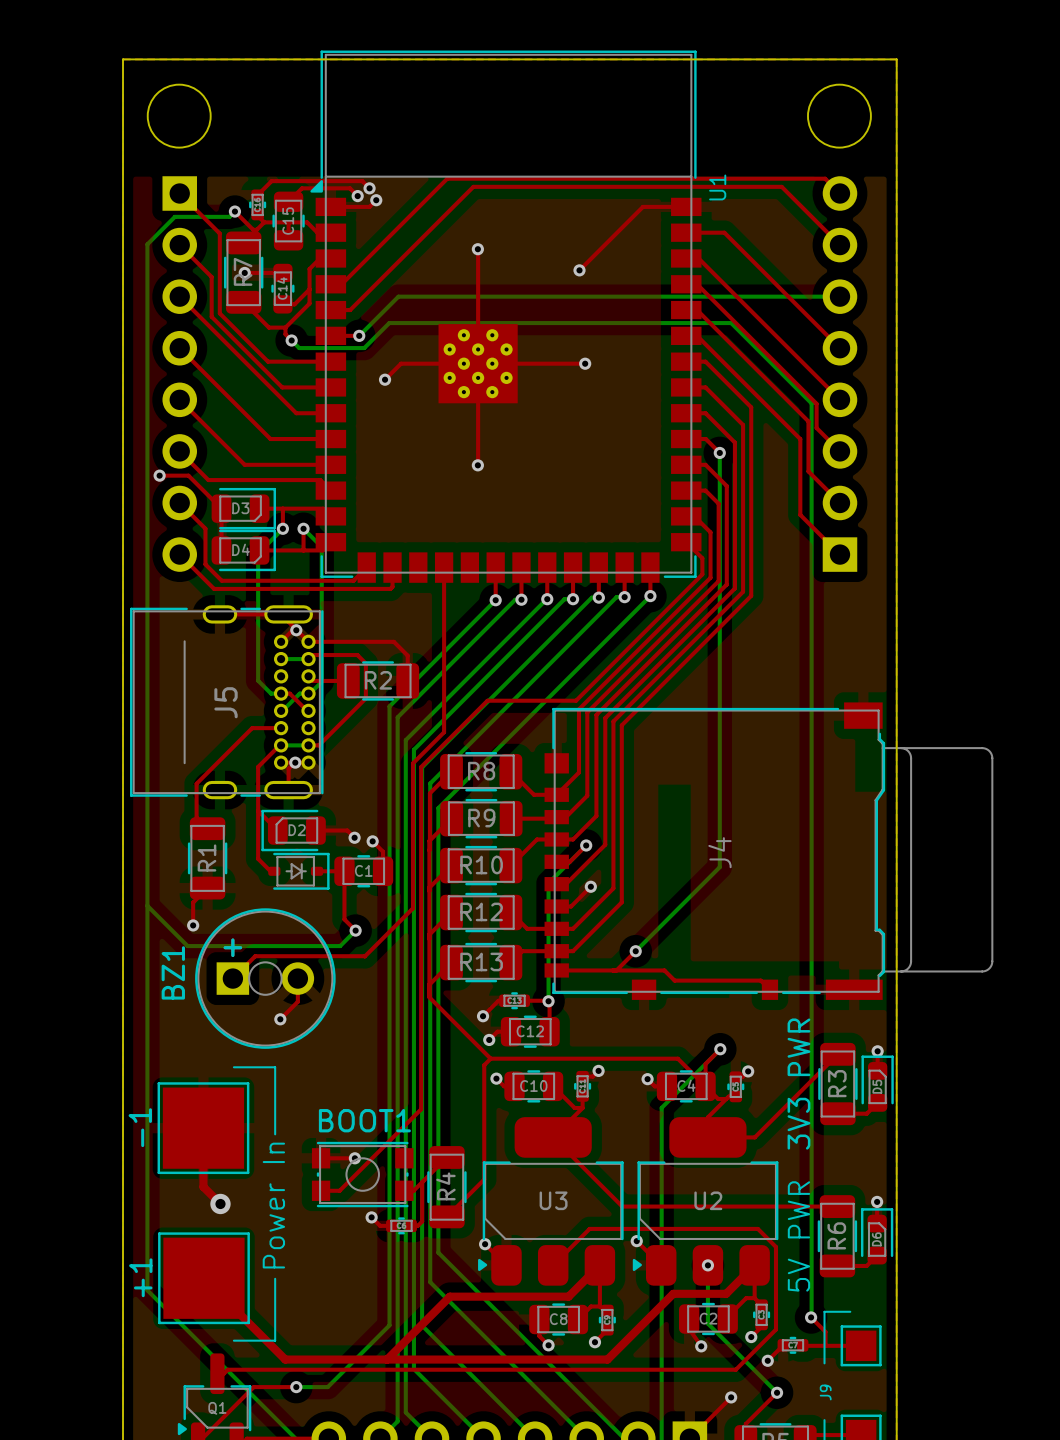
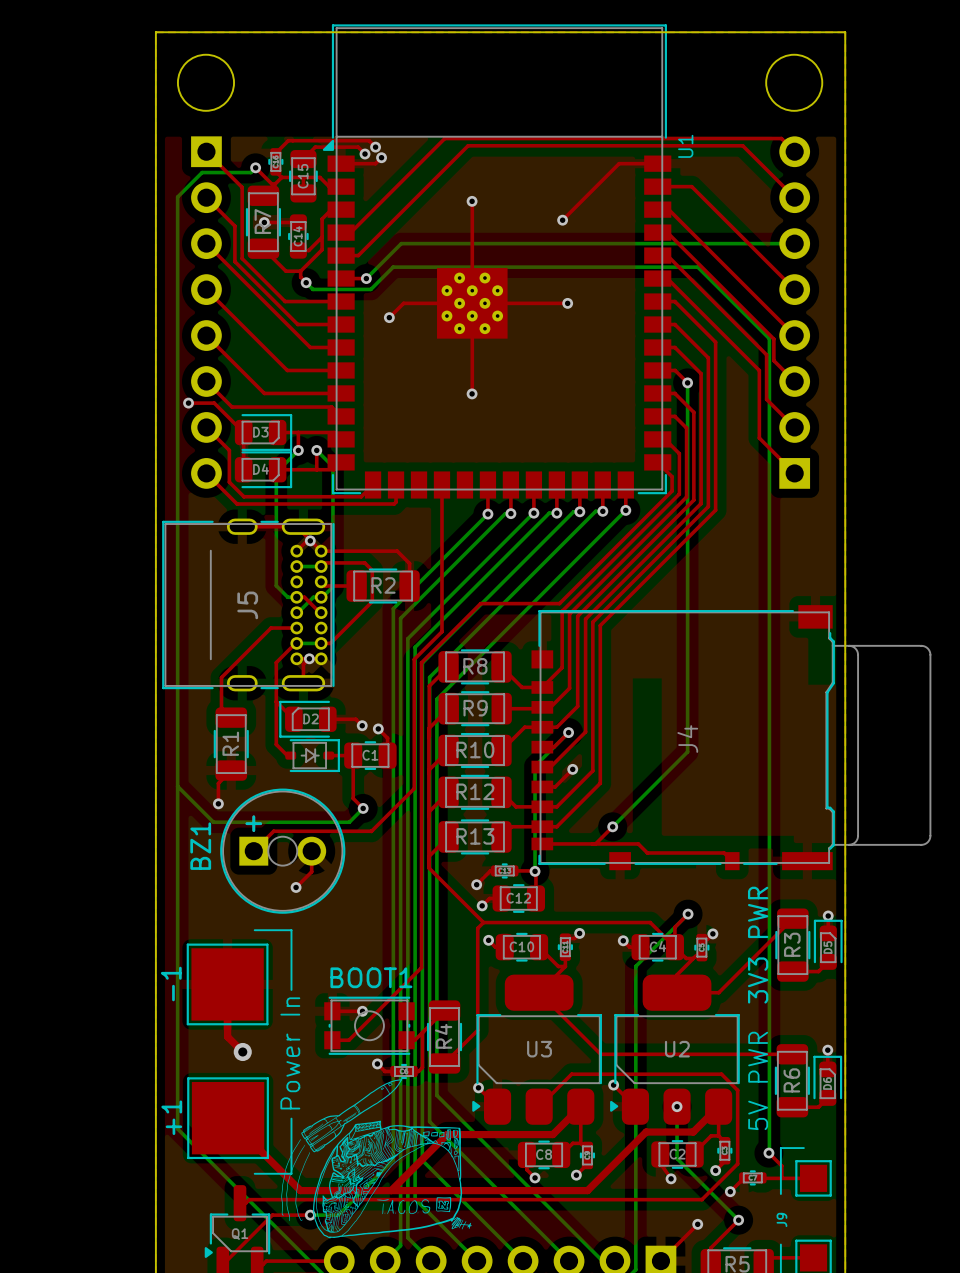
drawing: none -> [281, 1078, 472, 1239]

